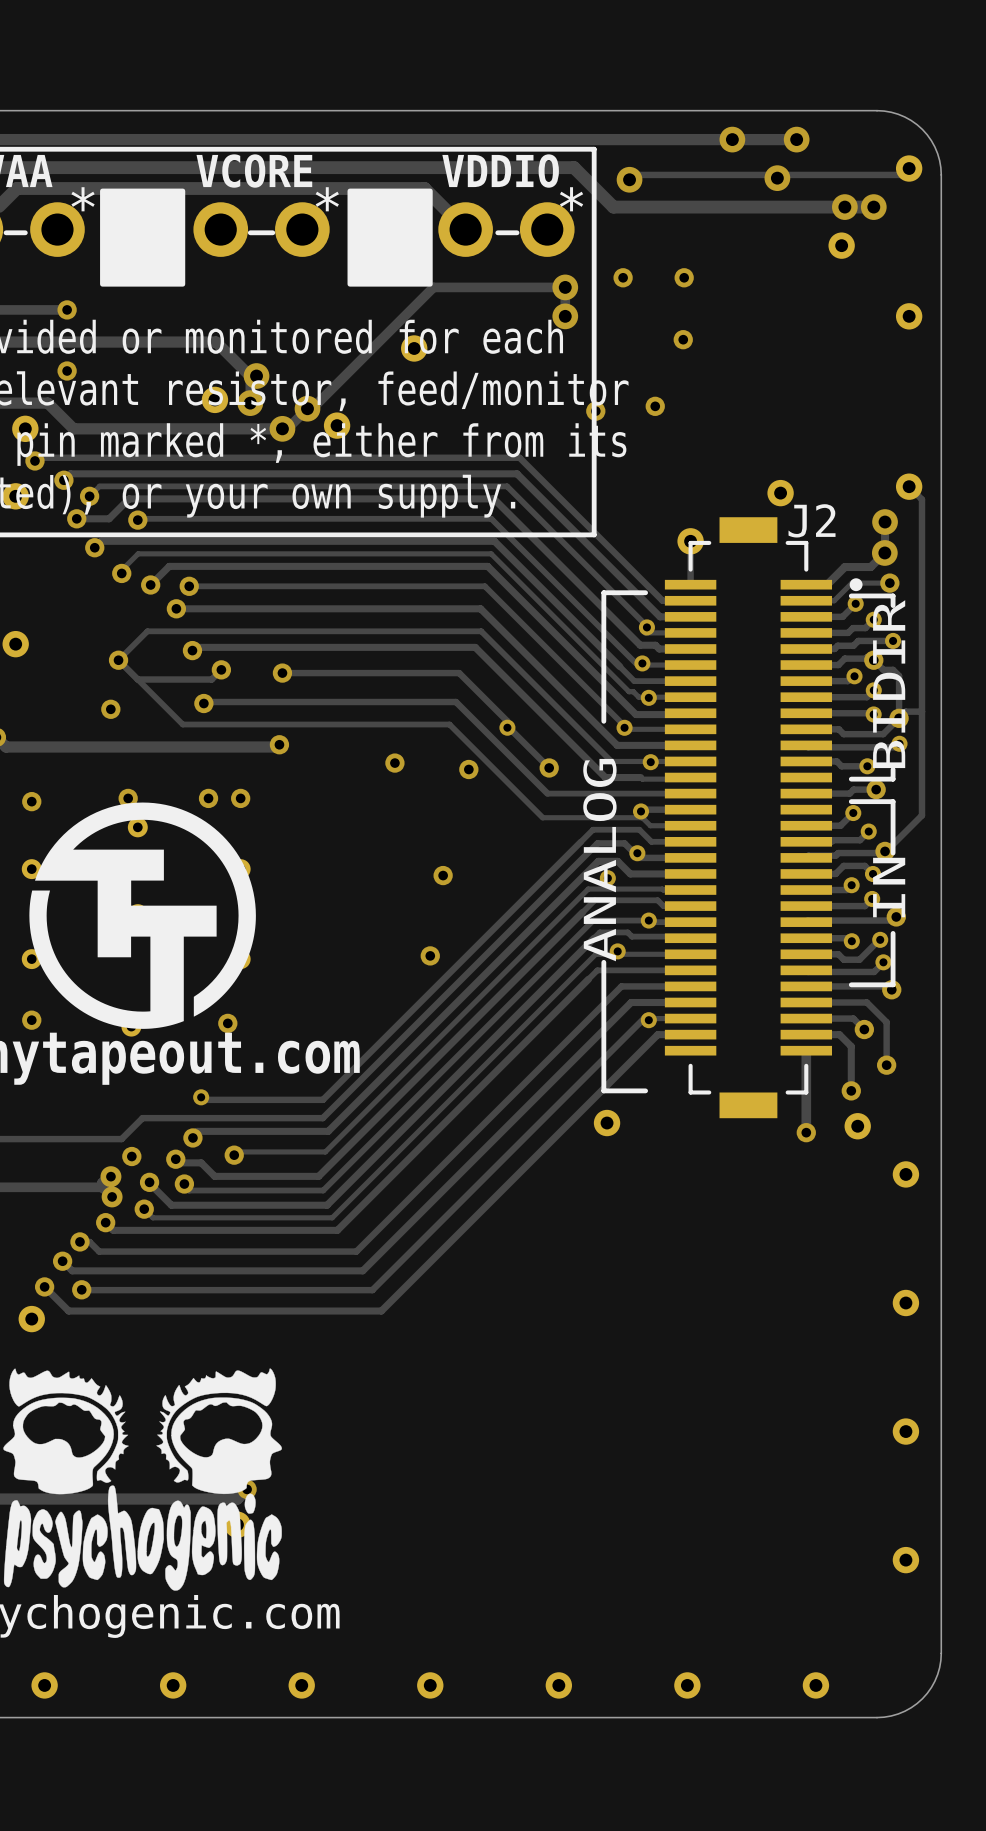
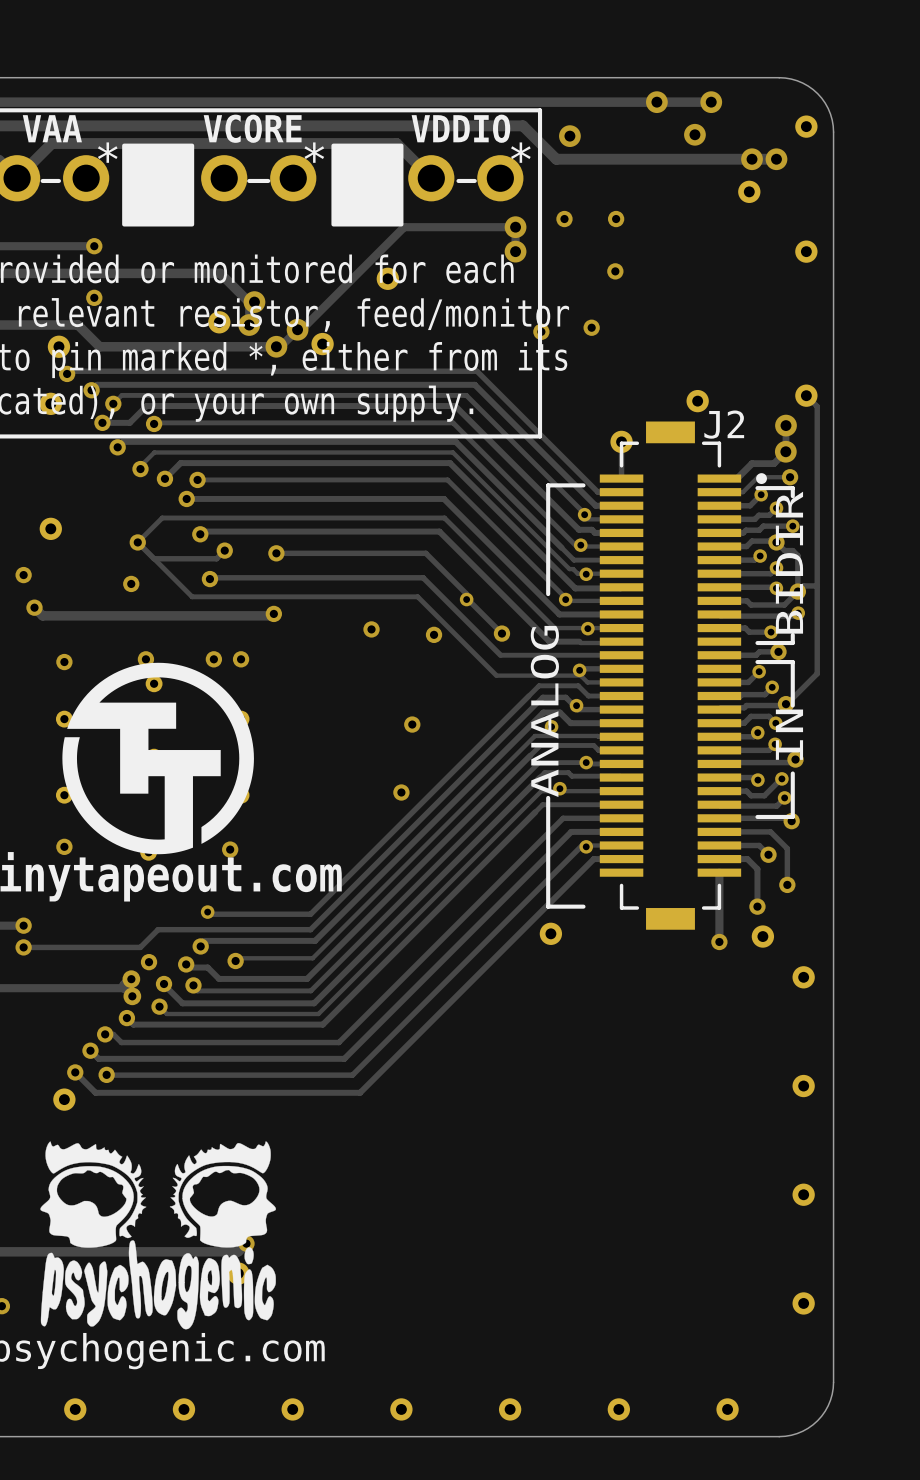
track: (909, 168) (902, 174) (780, 174) (777, 178) (774, 174) (634, 174) (629, 179) -> none

